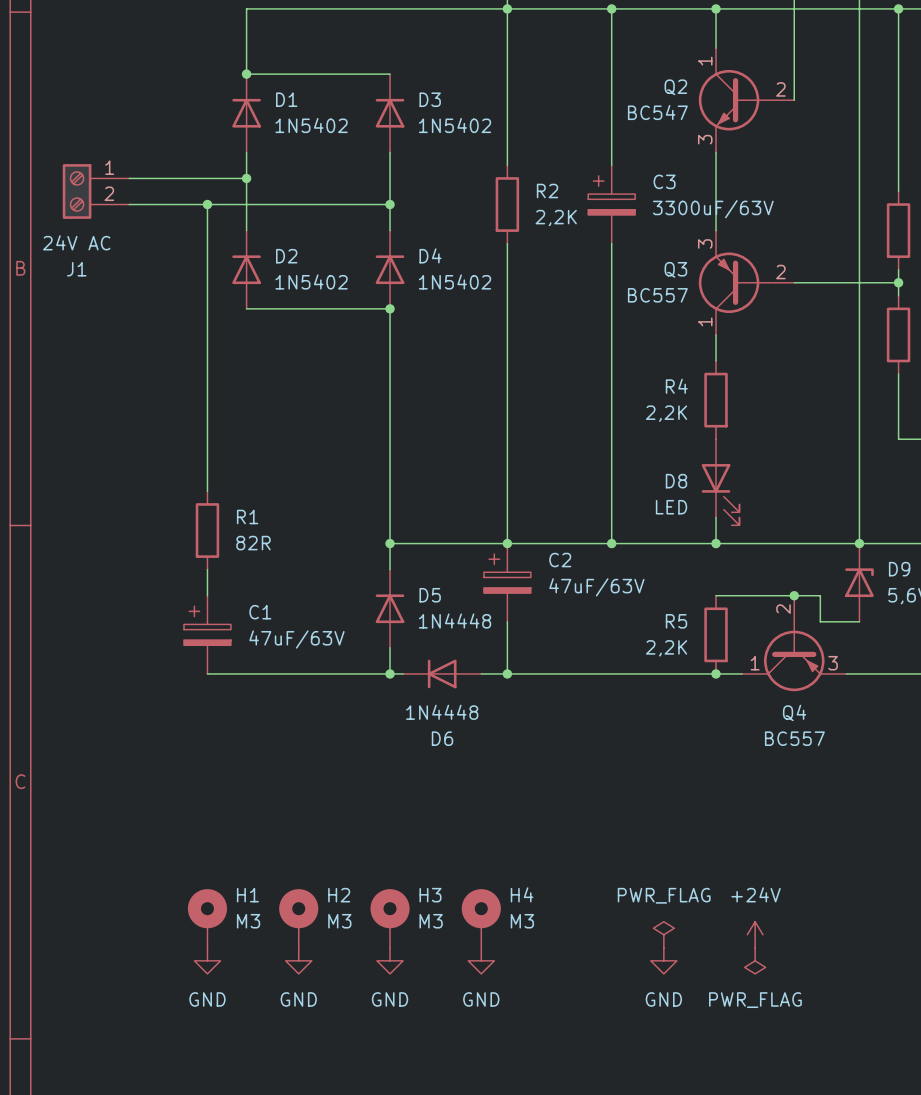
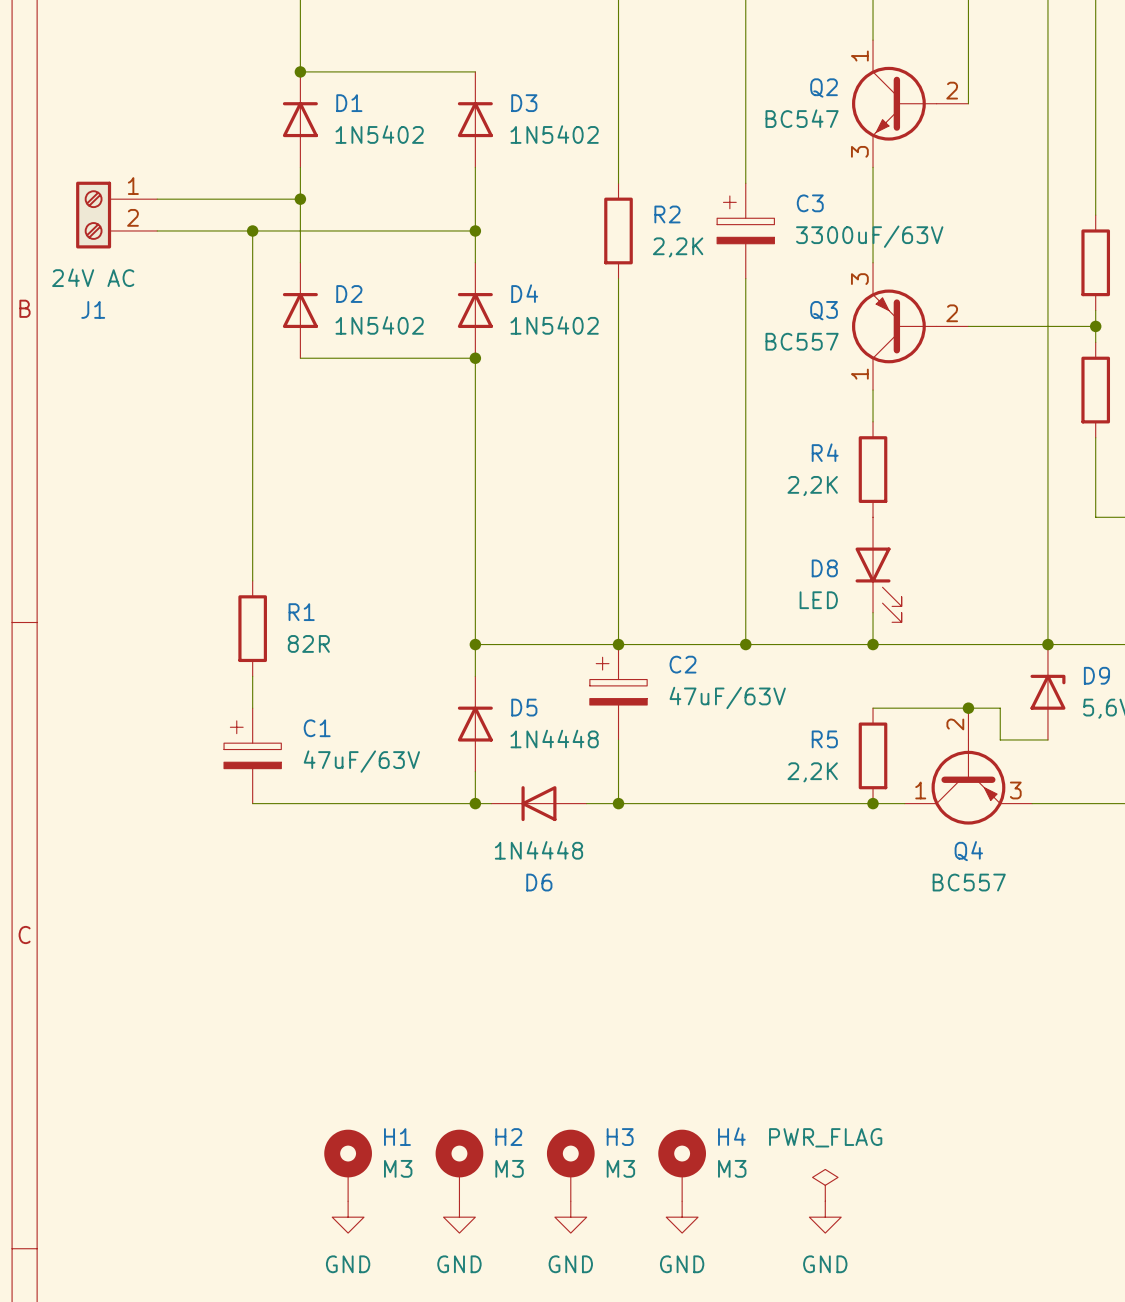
H1 position: (207, 918) -> (348, 1165)
H2 position: (298, 918) -> (459, 1165)
H3 position: (390, 918) -> (570, 1165)
H4 position: (481, 918) -> (682, 1165)
power symbol: PWR_FLAG (663, 934) -> none
power symbol: +24V (755, 934) -> none
power symbol: GND (207, 960) -> none
power symbol: GND (298, 960) -> none
power symbol: GND (390, 960) -> none
power symbol: GND (481, 960) -> none
power symbol position: GND (663, 960) -> GND (825, 1217)
power symbol: PWR_FLAG (755, 960) -> none
power symbol: none -> PWR_FLAG (825, 1185)
power symbol: none -> GND (348, 1217)
power symbol: none -> GND (459, 1217)
power symbol: none -> GND (570, 1217)
power symbol: none -> GND (682, 1217)

